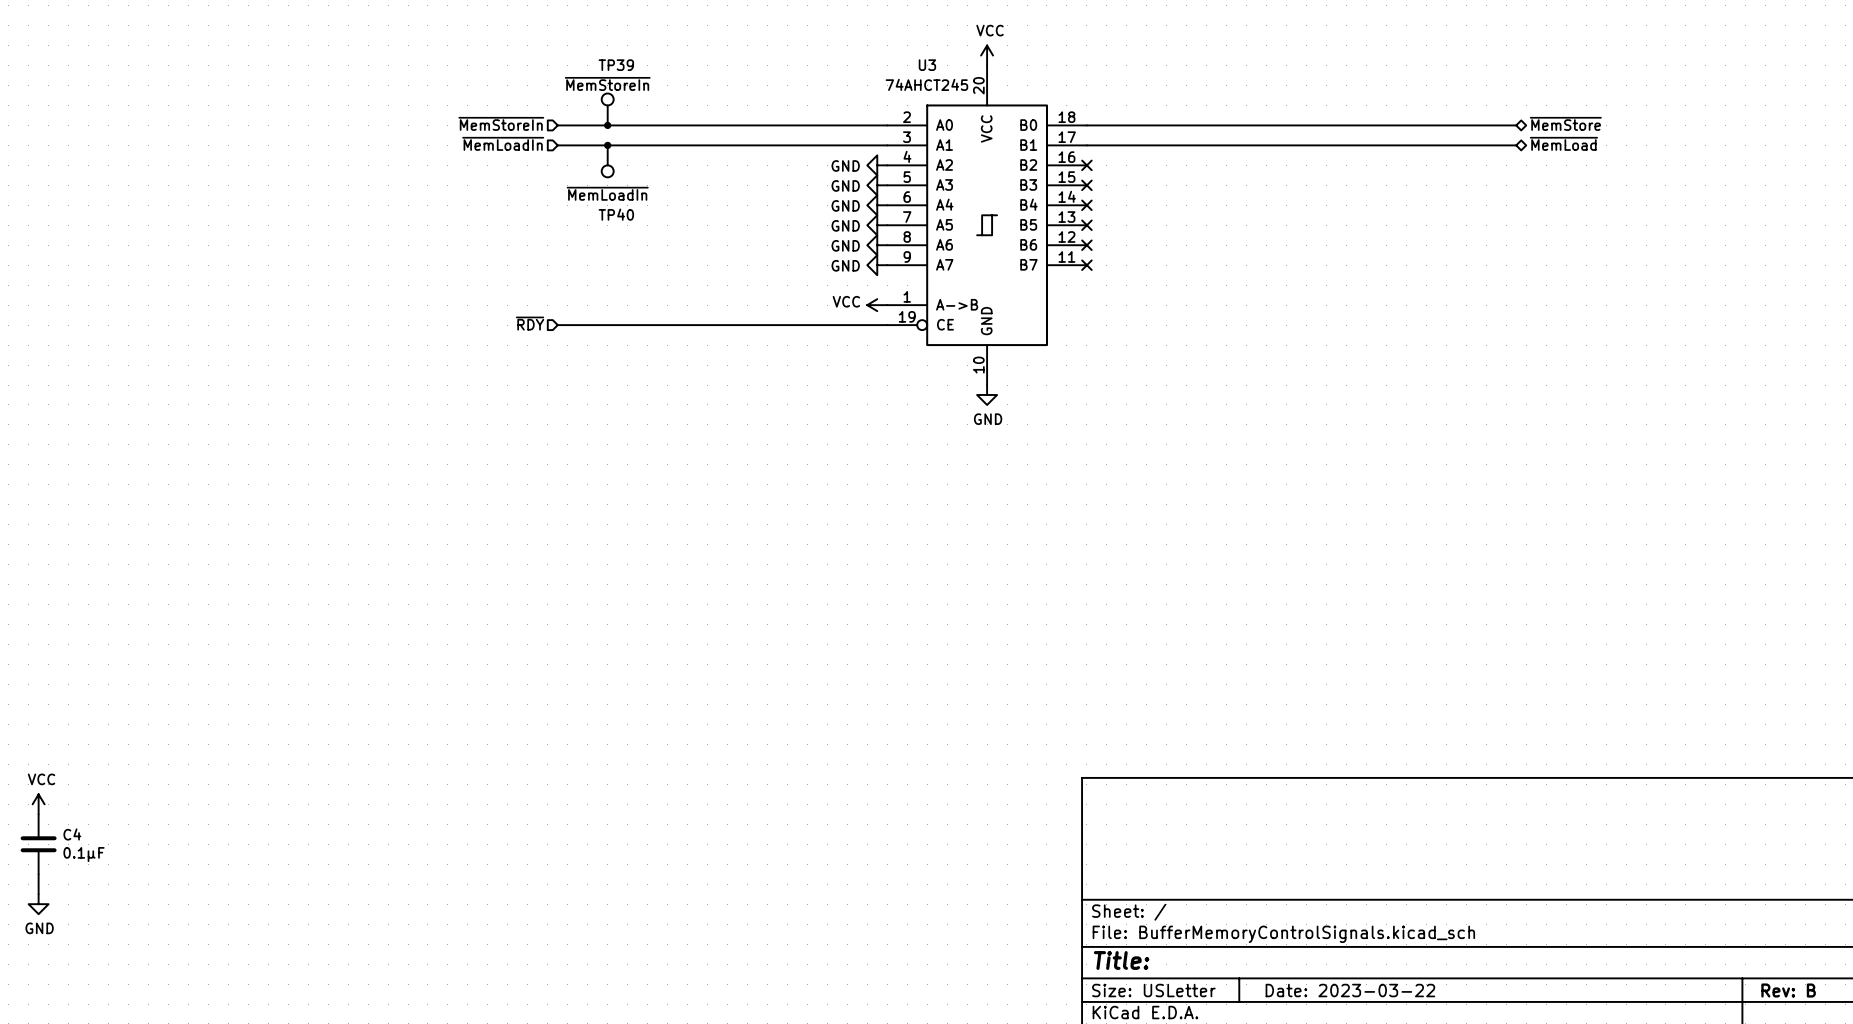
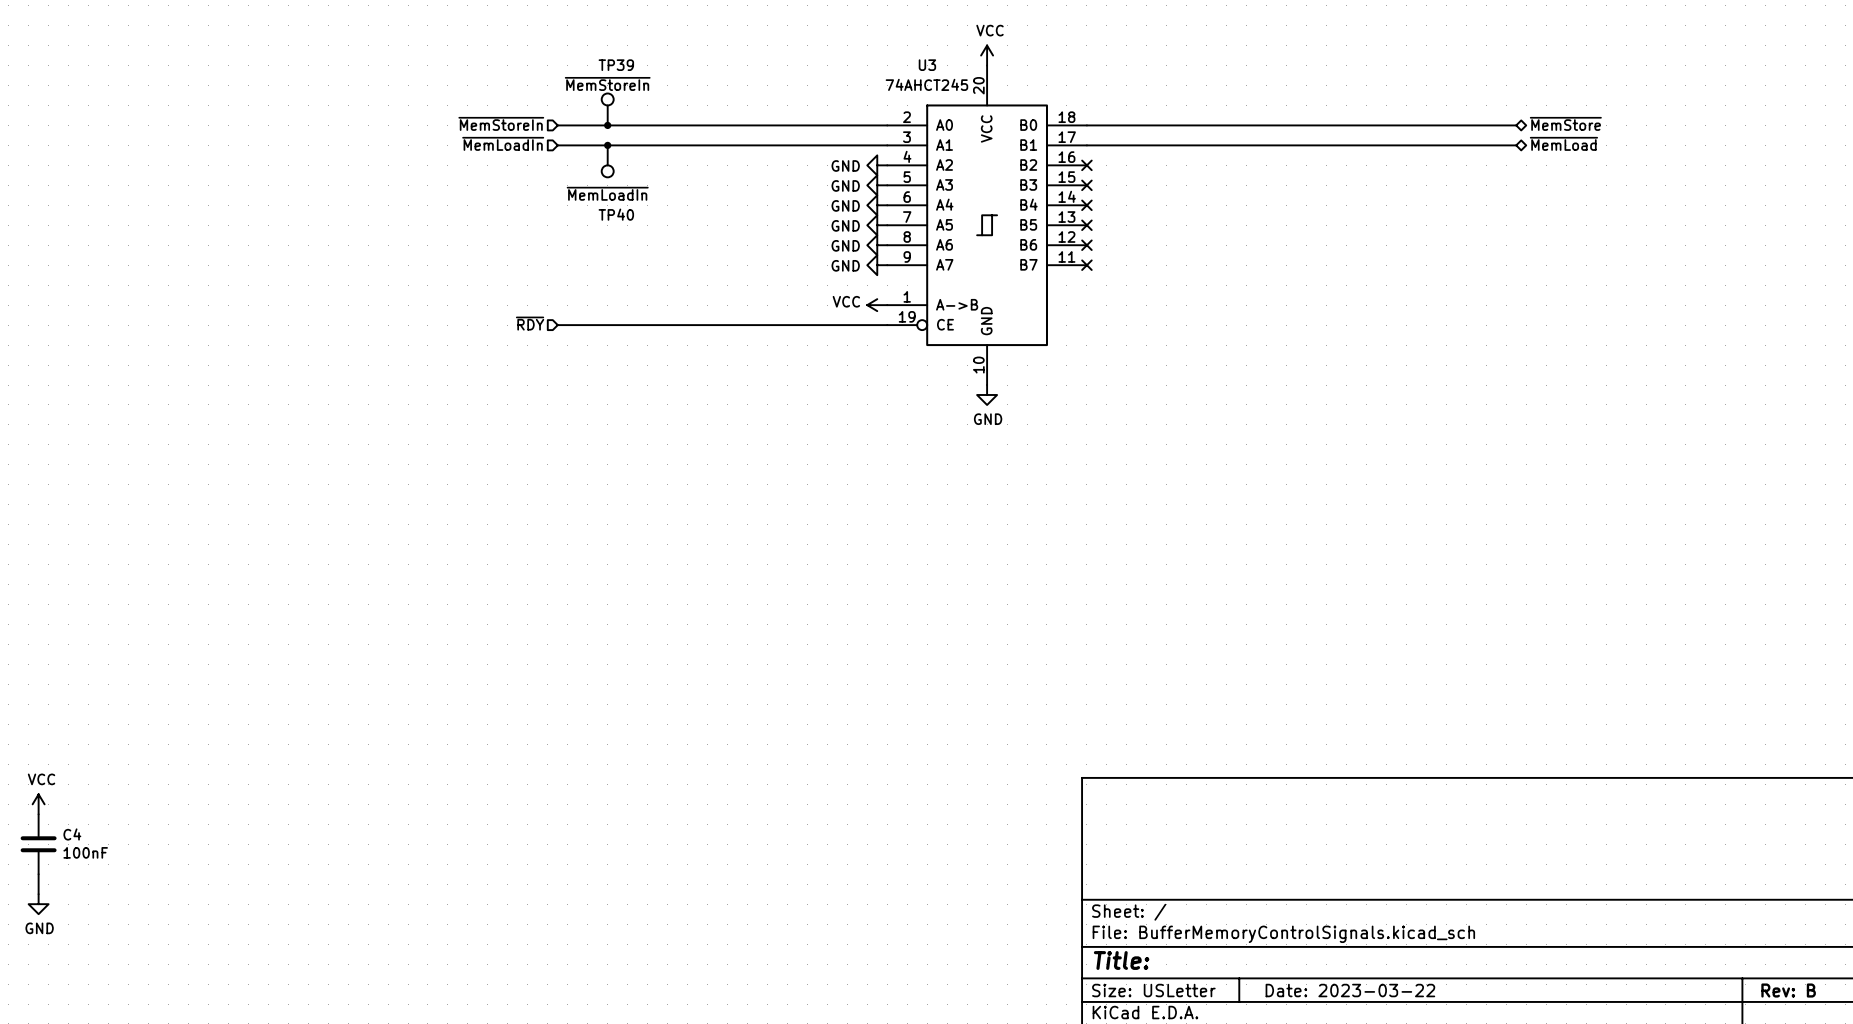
C4 value: 0.1μF (84, 854) -> 100nF (85, 852)

